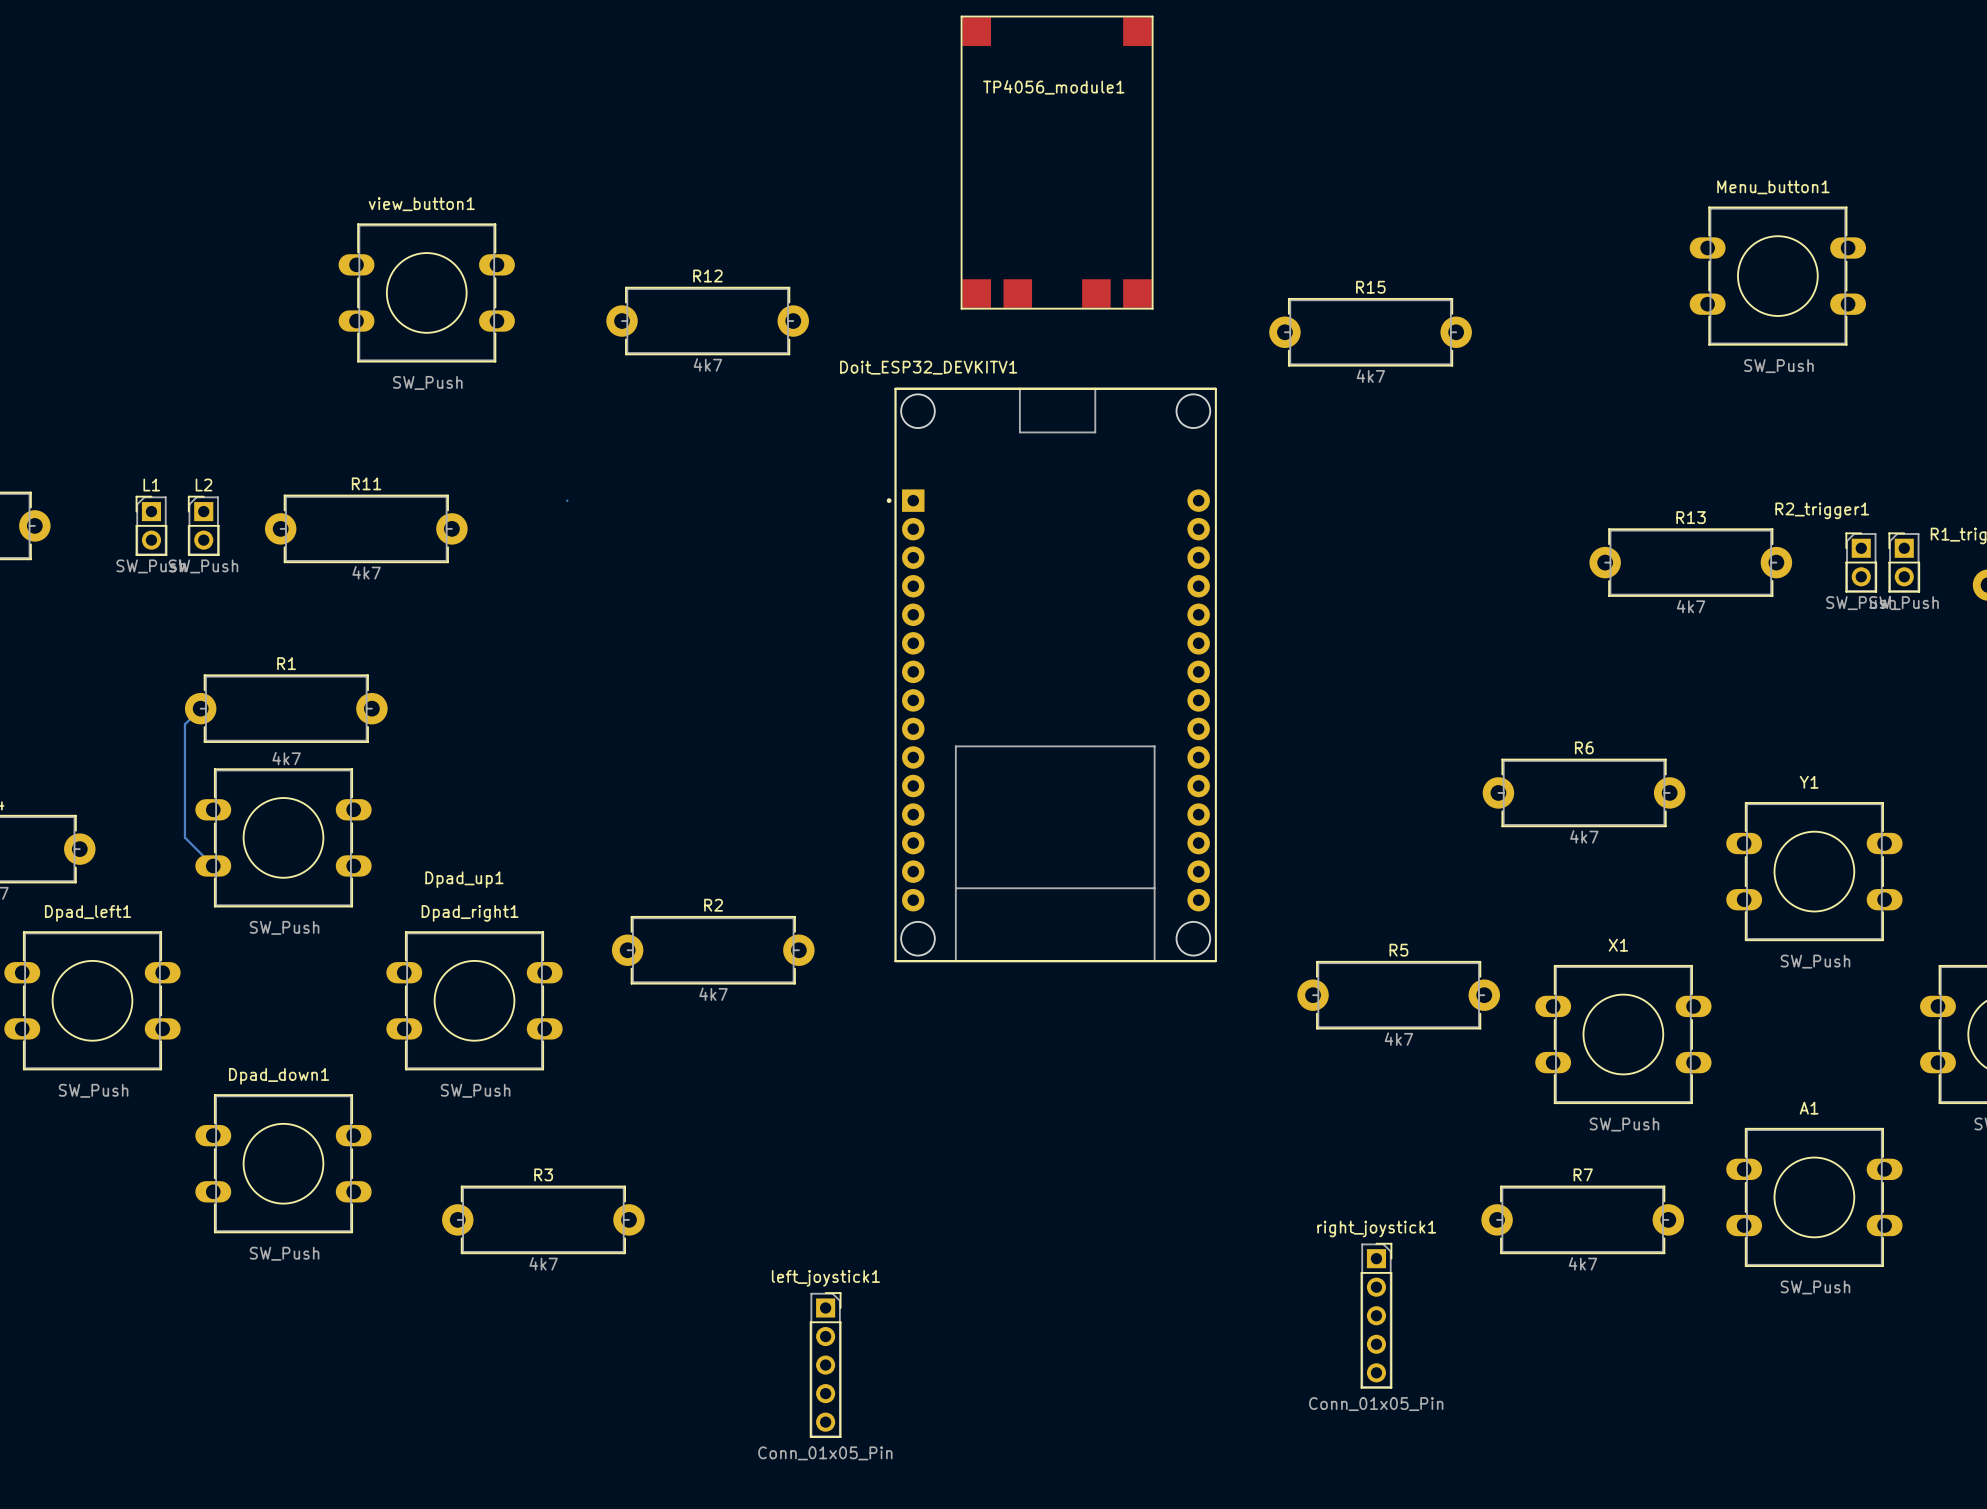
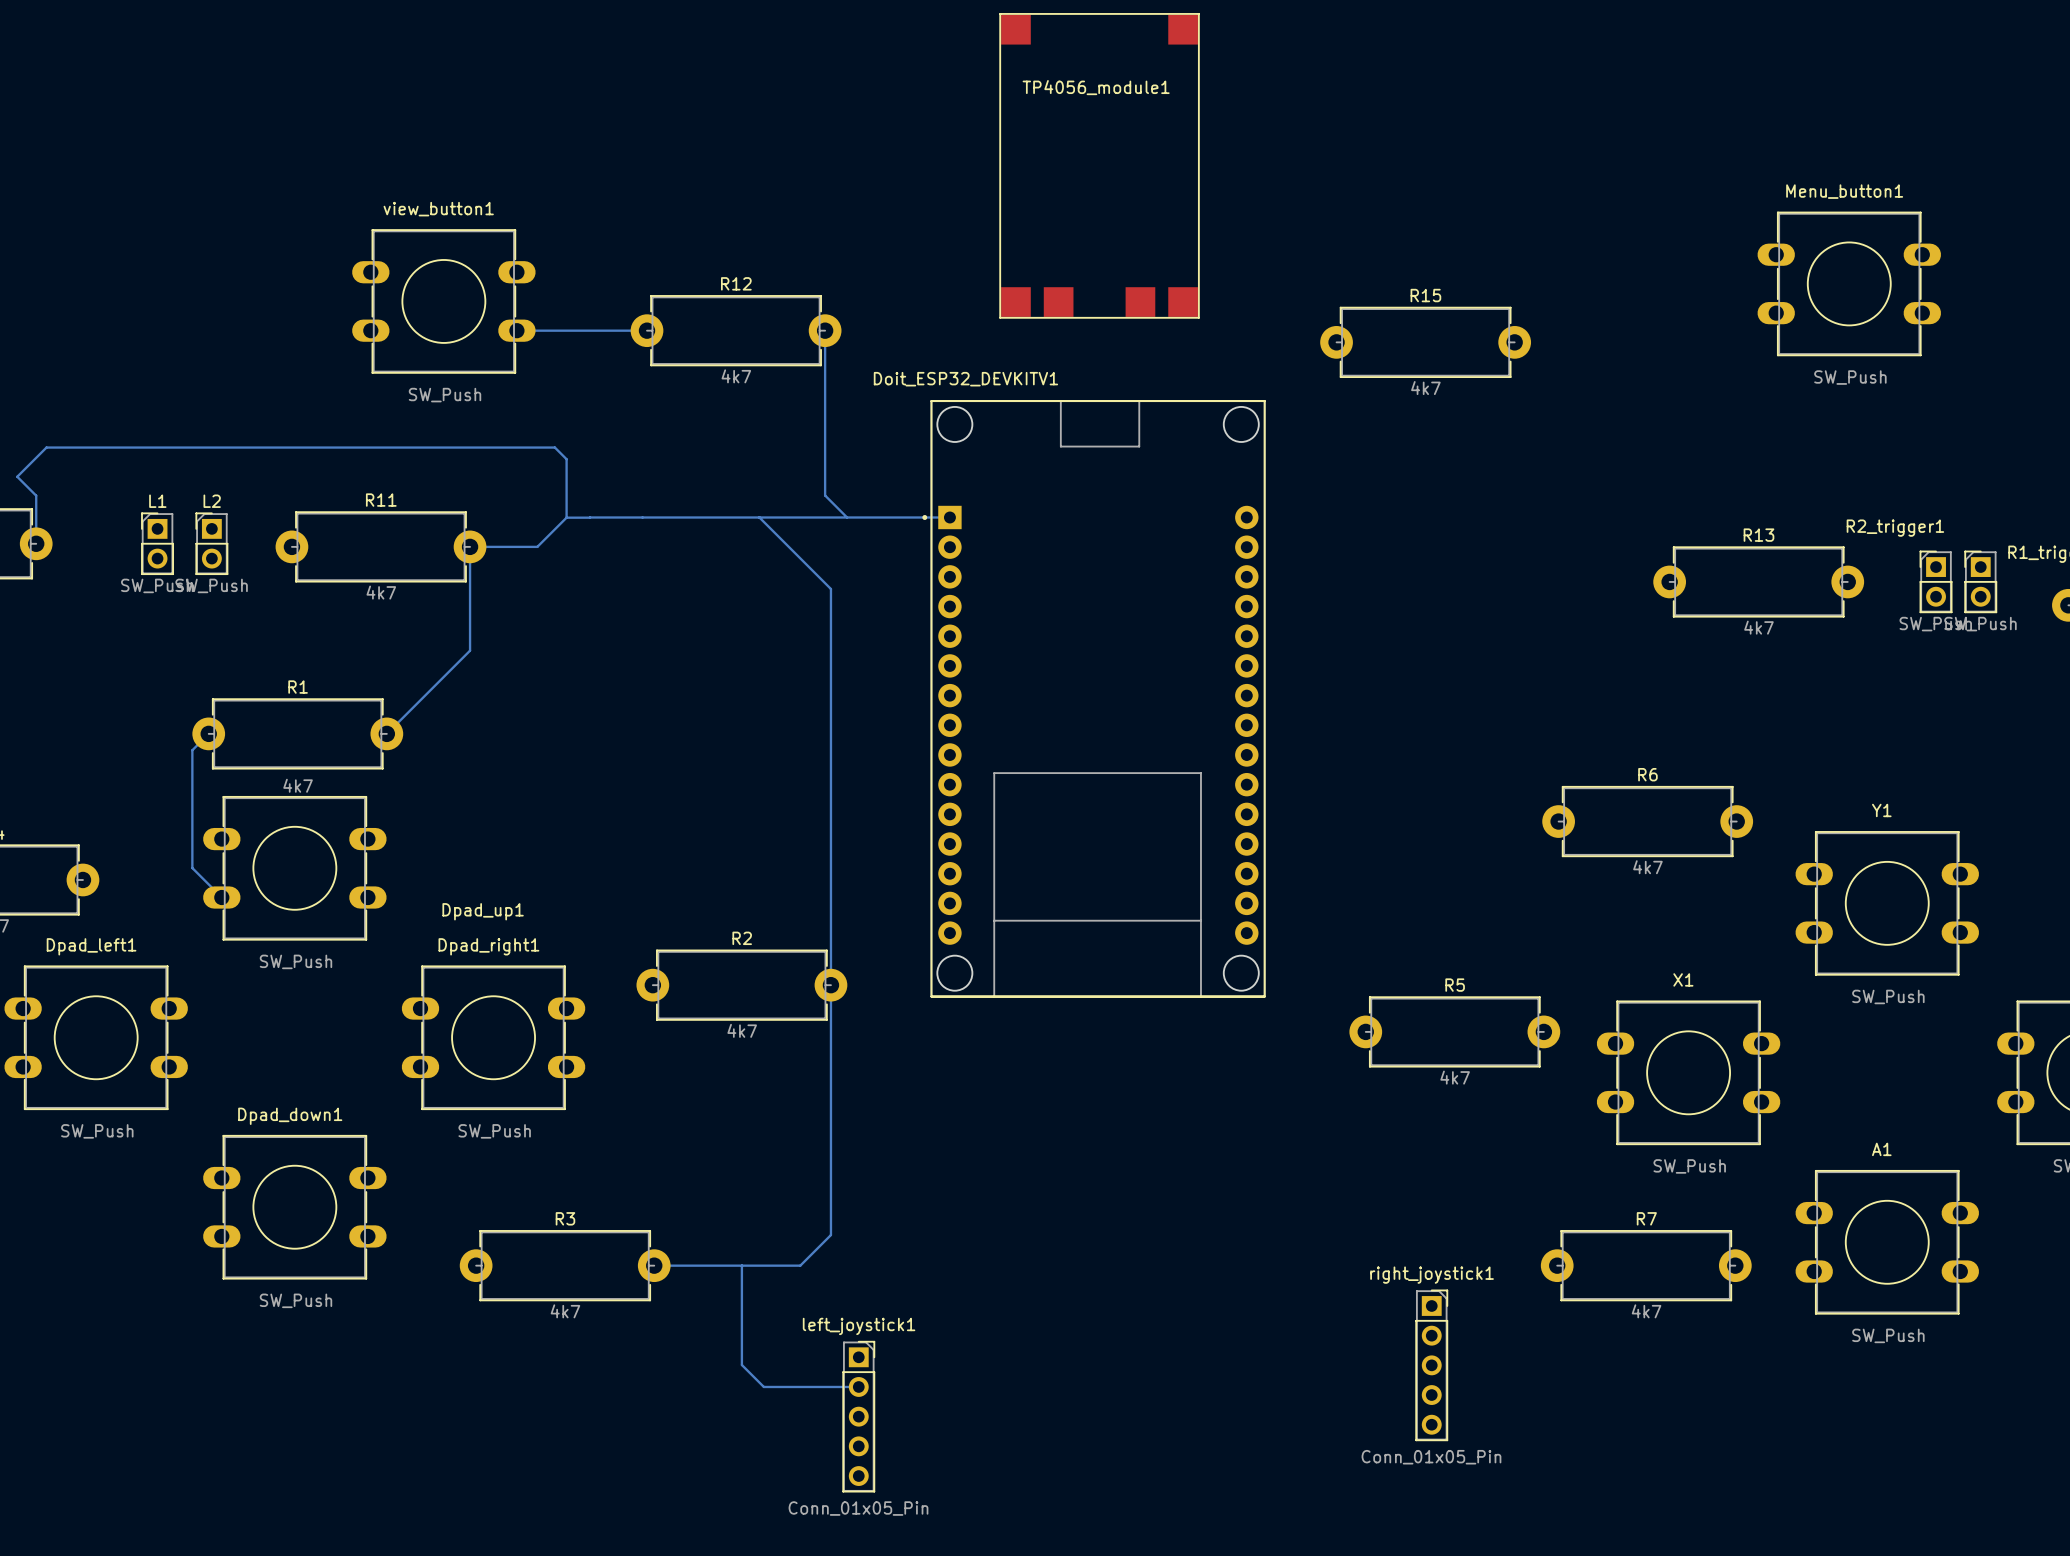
bottom track: none -> (516, 330) (647, 330)
bottom track: none -> (825, 330) (825, 495) (847, 517)
bottom track: none -> (566, 517) (537, 546) (470, 546) (470, 650) (386, 733)
bottom track: none -> (566, 517) (566, 459) (554, 447) (46, 447) (17, 476) (36, 495) (36, 543)
bottom track: none -> (566, 517) (589, 517)
bottom track: none -> (590, 517) (949, 517)
bottom track: none -> (759, 517) (830, 589) (830, 1235) (800, 1265) (654, 1265)
bottom track: none -> (741, 1265) (741, 1365) (763, 1386) (858, 1386)

